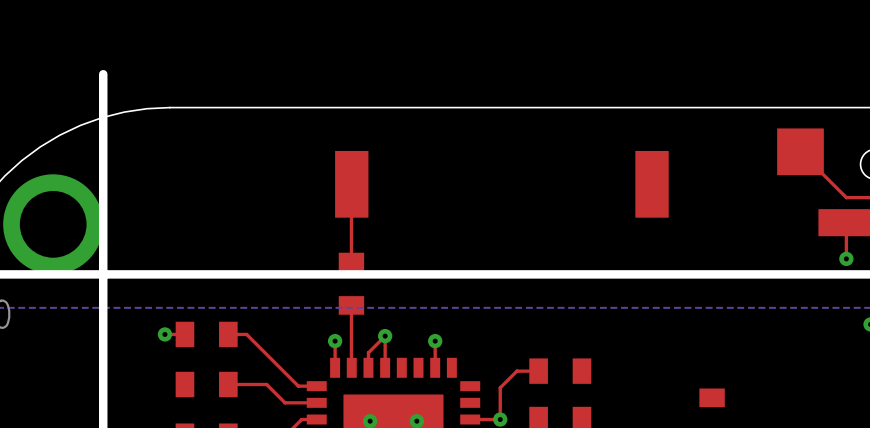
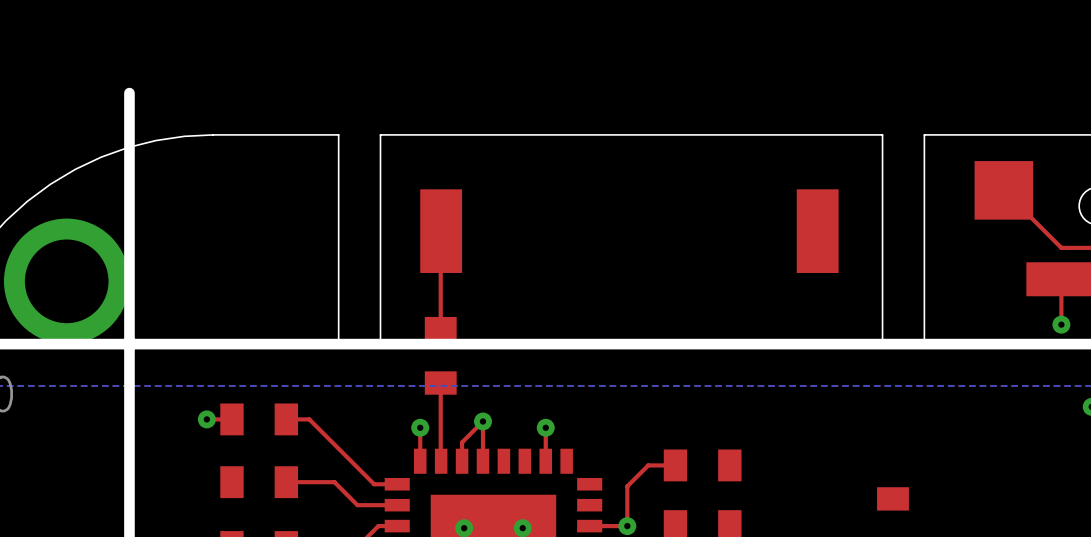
board edge: (303, 107) (270, 107) -> (380, 134) (380, 344) (338, 344) (338, 134)
board edge: (737, 107) (703, 107) -> (924, 134) (924, 344) (882, 344) (882, 134)

